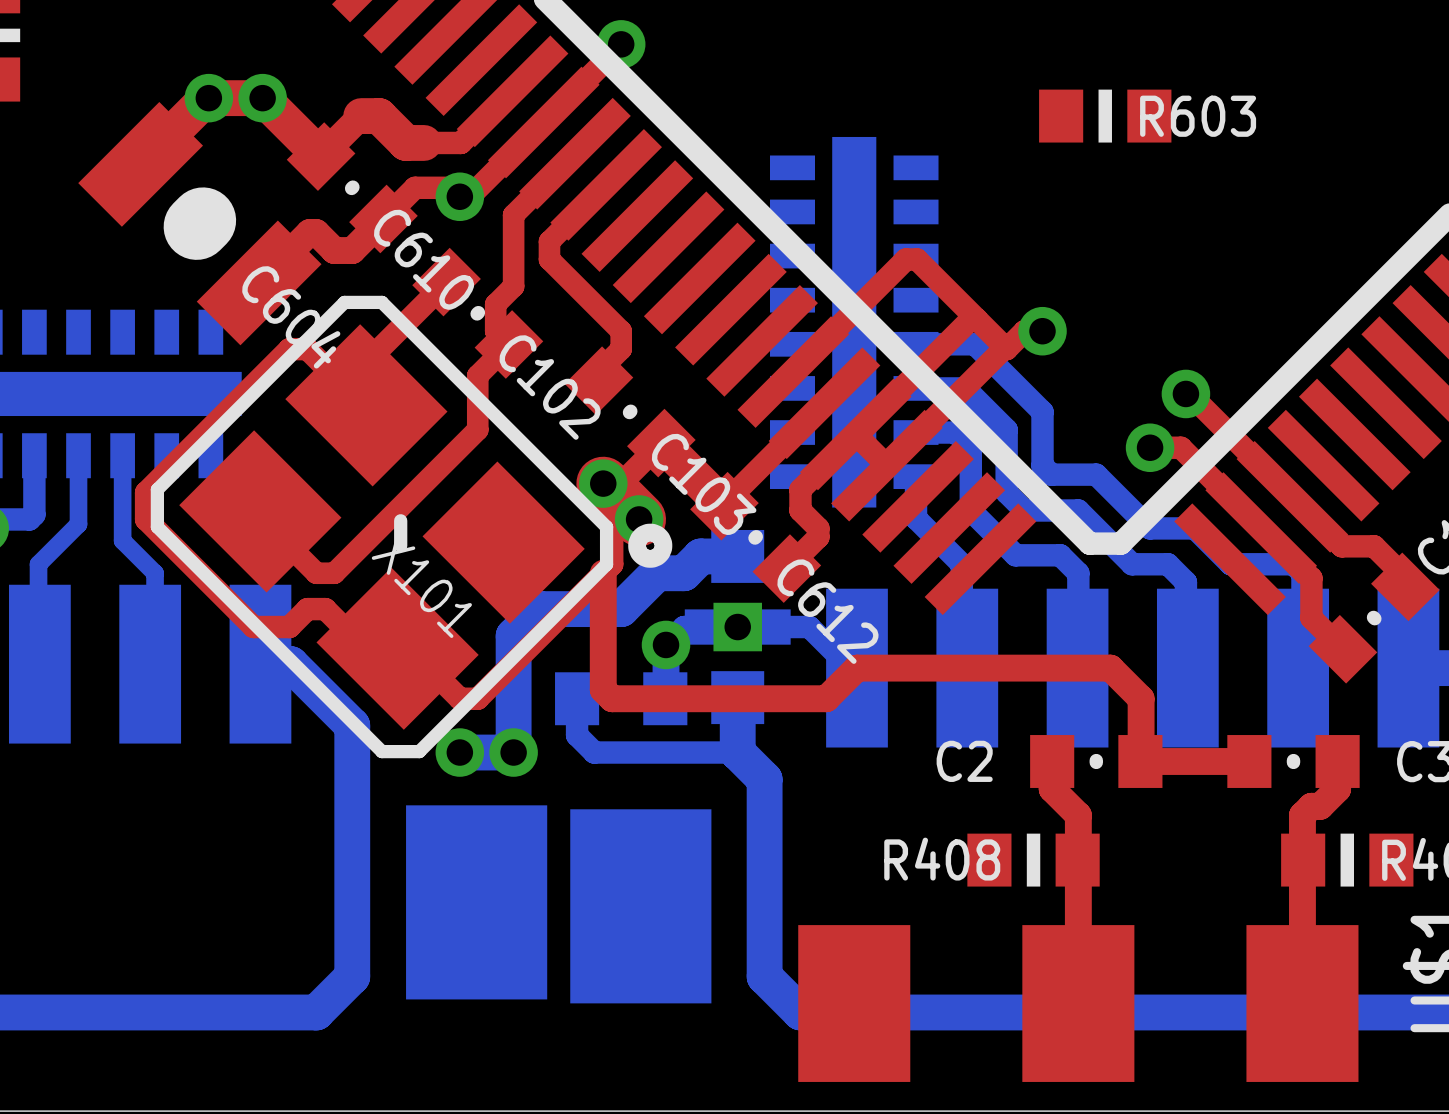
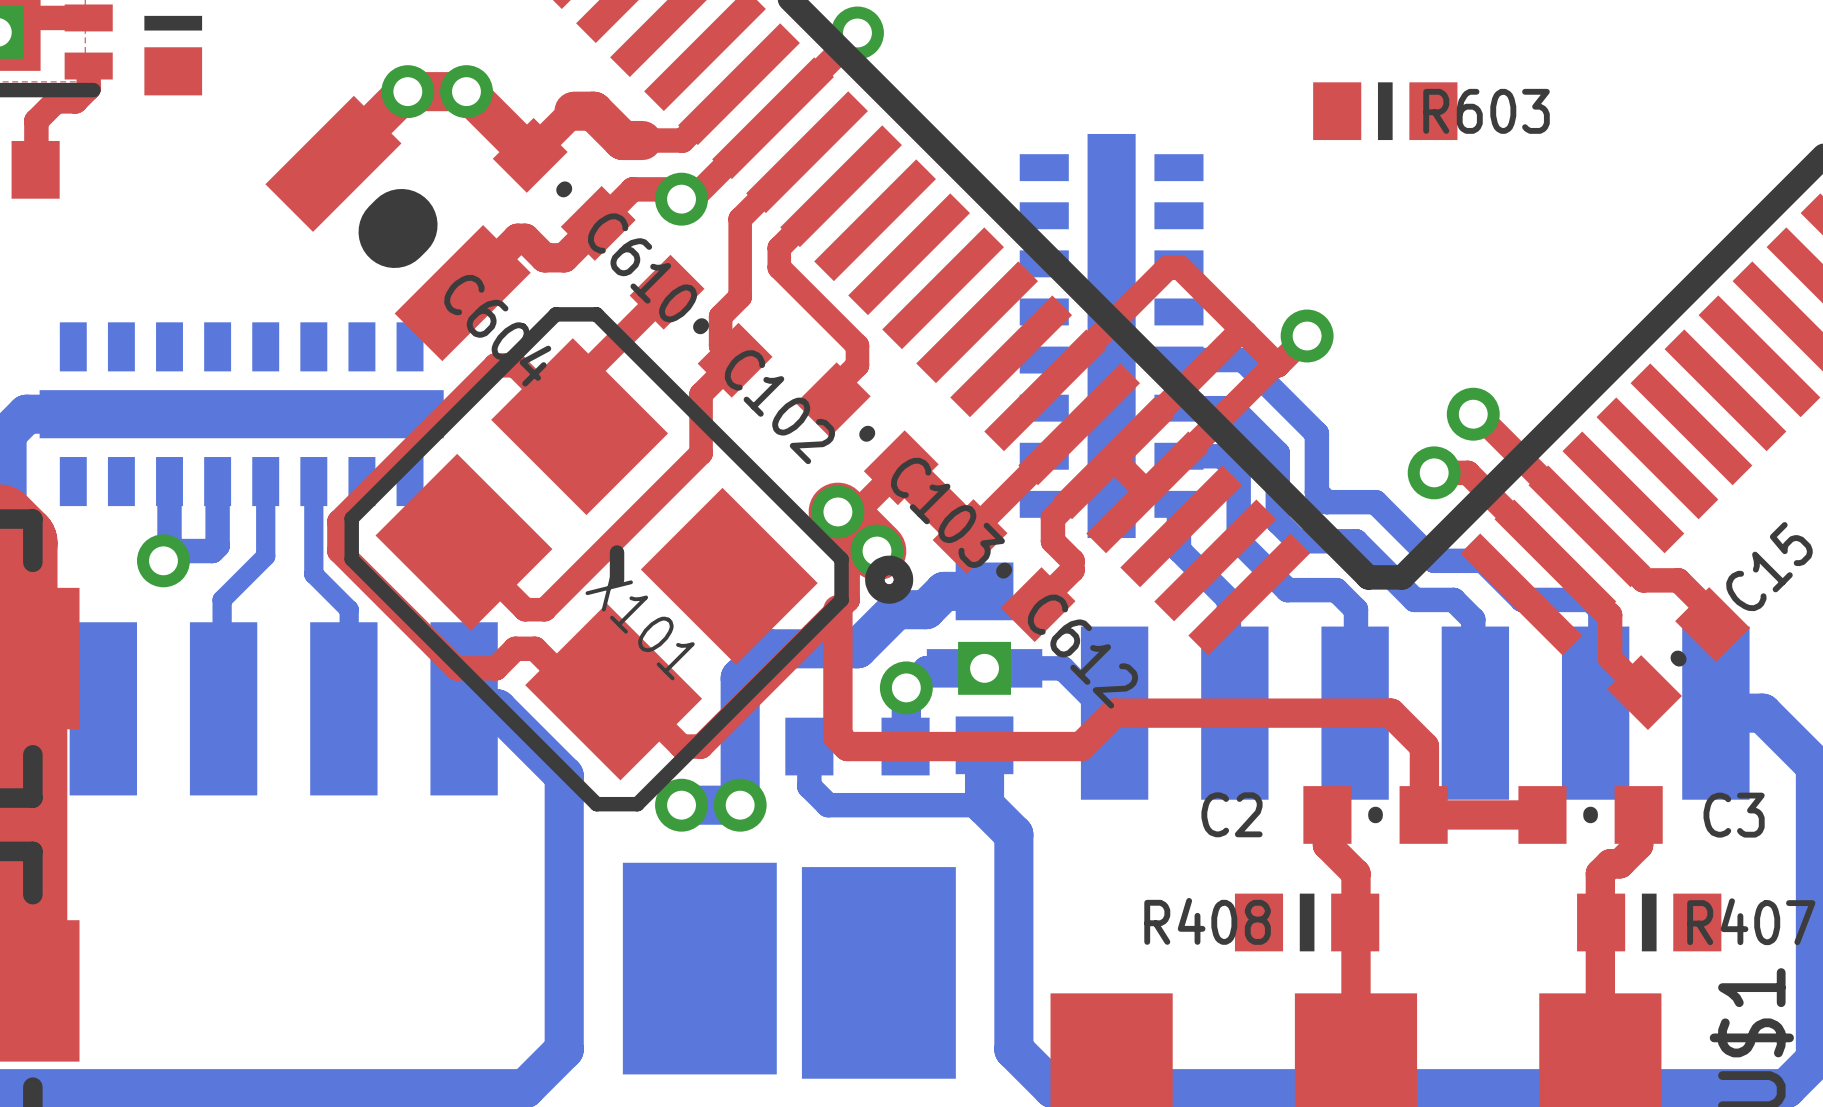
via position: (1042, 331) -> (1307, 336)

